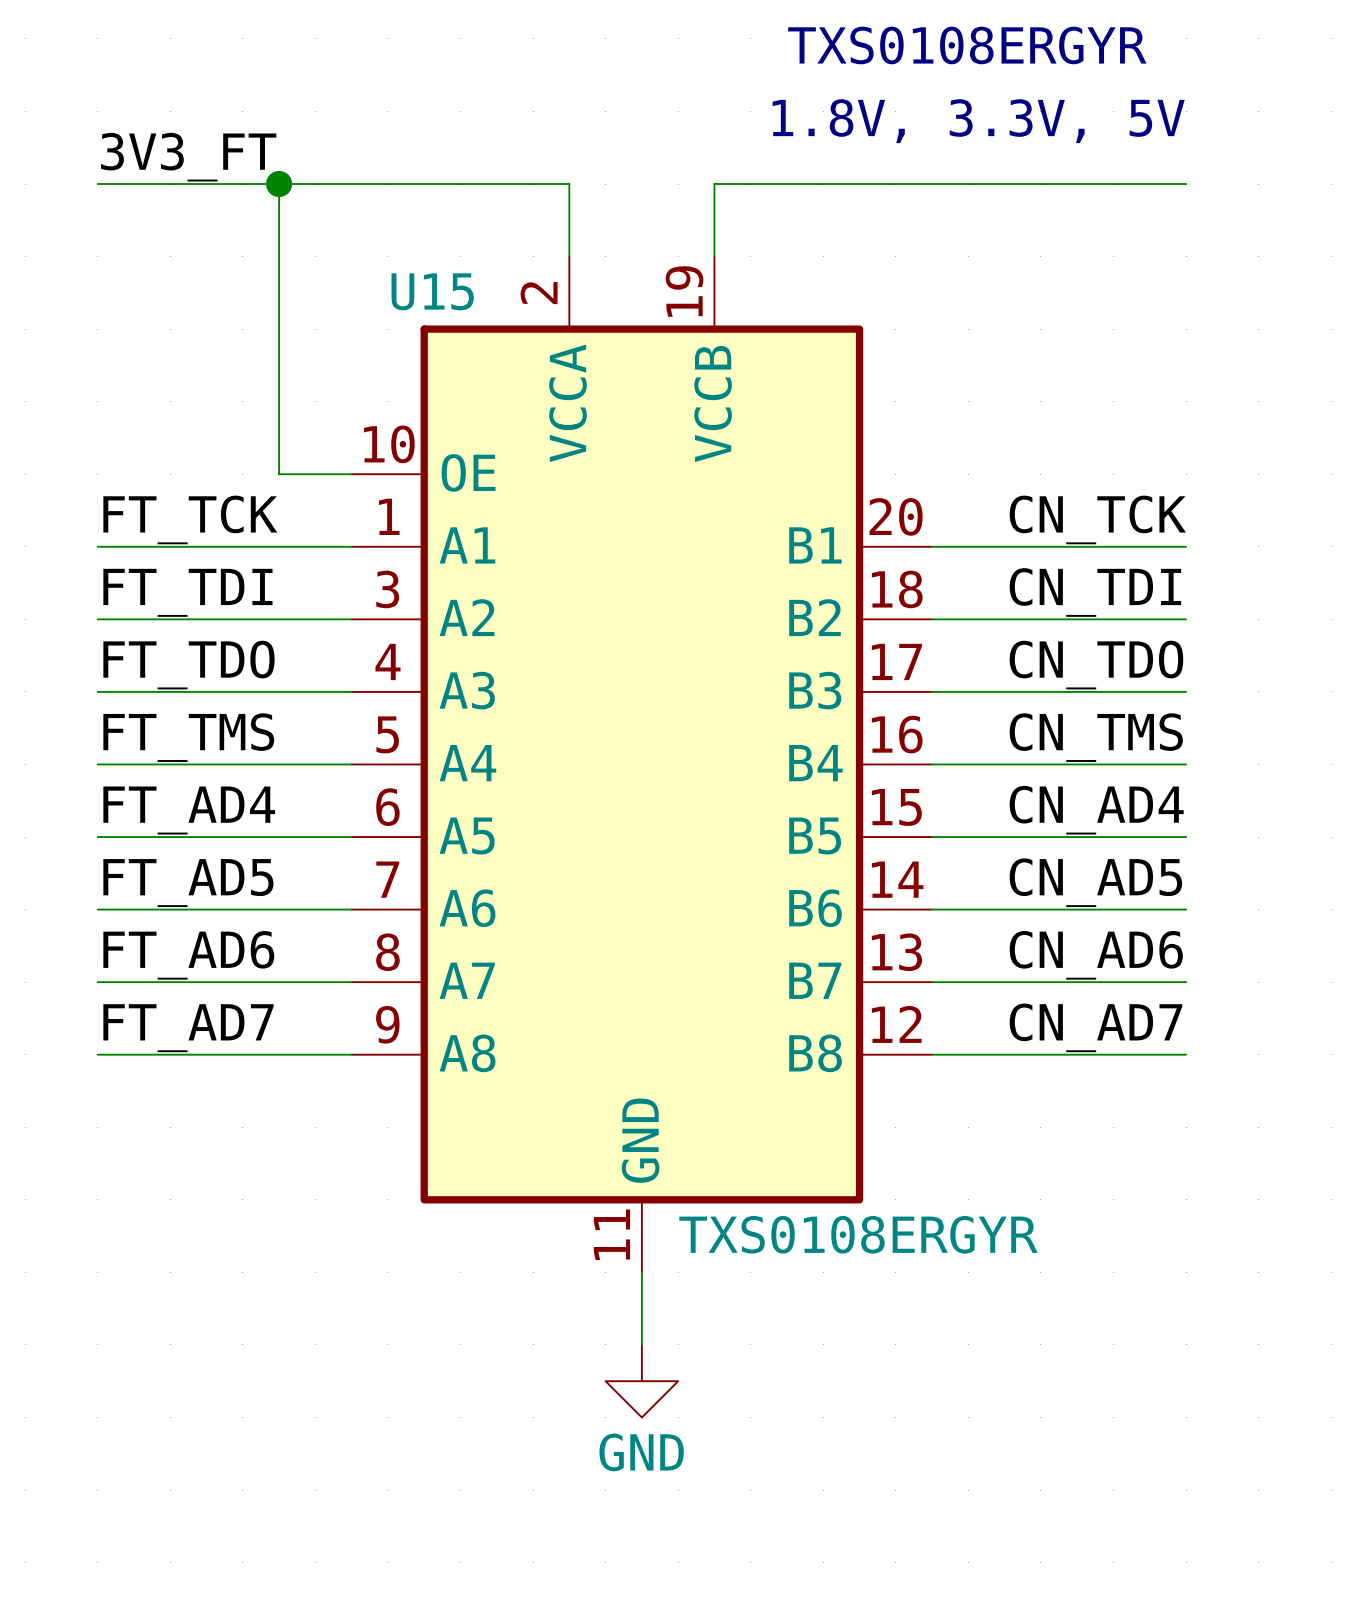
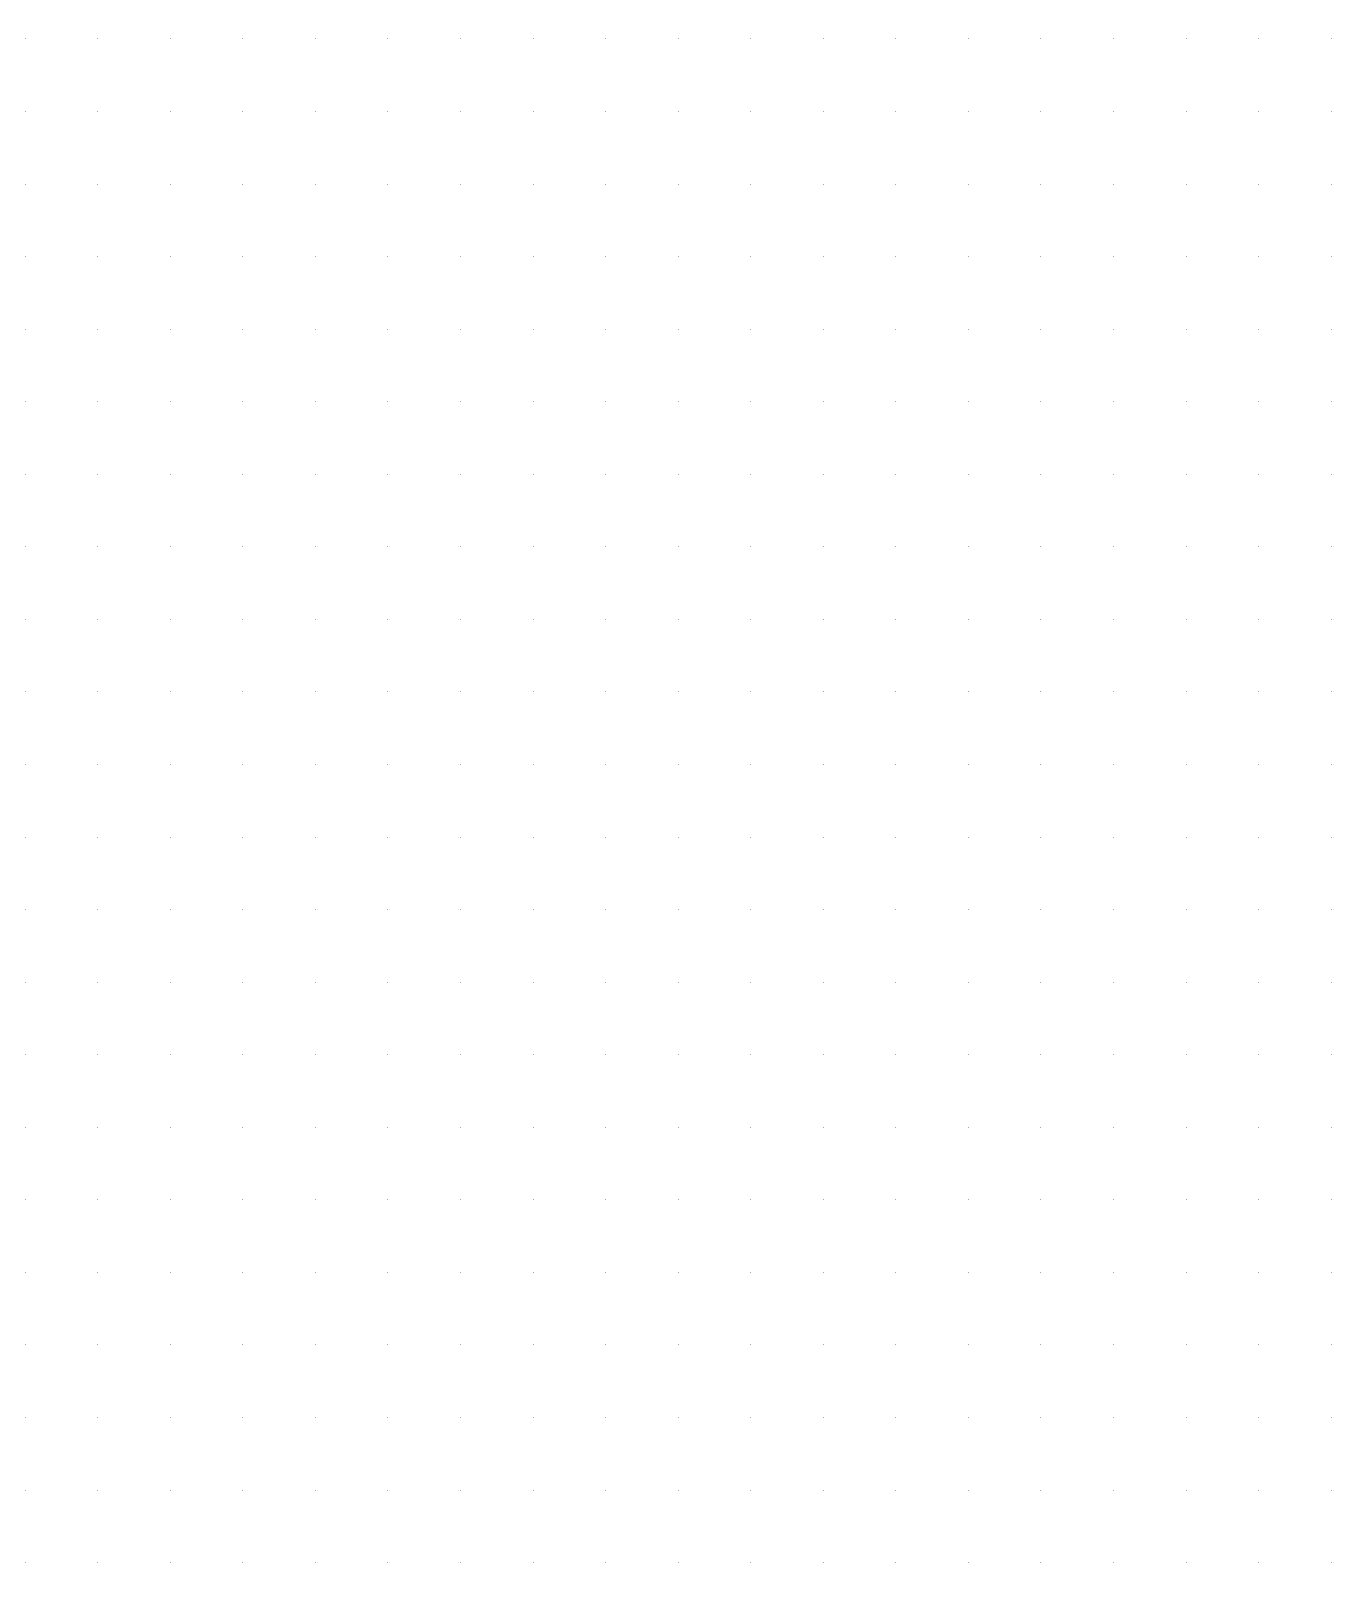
text: TXS0108ERGYR (967, 45) -> none
text: 1.8V, 3.3V, 5V (978, 121) -> none
label: 3V3_FT (188, 157) -> none
wire: (97, 184) (569, 184) (569, 256) -> none
wire: (279, 184) (279, 474) (351, 474) -> none
junction: (279, 184) -> none
wire: (1186, 184) (714, 184) (714, 256) -> none
label: FT_TCK (190, 519) -> none
label: CN_TCK (1097, 519) -> none
wire: (97, 546) (351, 546) -> none
wire: (932, 546) (1186, 546) -> none
label: FT_TDI (187, 592) -> none
label: CN_TDI (1095, 592) -> none
wire: (97, 619) (351, 619) -> none
wire: (932, 619) (1186, 619) -> none
label: FT_TDO (189, 665) -> none
label: CN_TDO (1096, 665) -> none
wire: (97, 691) (351, 691) -> none
wire: (932, 691) (1186, 691) -> none
label: FT_TMS (188, 737) -> none
label: CN_TMS (1096, 737) -> none
wire: (97, 764) (351, 764) -> none
U15: TXS0108ERGYR (641, 764) -> none
wire: (932, 764) (1186, 764) -> none
label: FT_AD4 (189, 810) -> none
label: CN_AD4 (1096, 810) -> none
wire: (97, 837) (351, 837) -> none
wire: (932, 837) (1186, 837) -> none
label: CN_AD5 (1095, 882) -> none
label: FT_AD5 (188, 883) -> none
wire: (97, 909) (351, 909) -> none
wire: (932, 909) (1186, 909) -> none
label: FT_AD6 (188, 955) -> none
label: CN_AD6 (1096, 955) -> none
wire: (97, 982) (351, 982) -> none
wire: (932, 982) (1186, 982) -> none
label: CN_AD7 (1096, 1027) -> none
label: FT_AD7 (188, 1028) -> none
wire: (97, 1054) (351, 1054) -> none
wire: (932, 1054) (1186, 1054) -> none
wire: (641, 1272) (641, 1344) -> none
power symbol: GND (641, 1381) -> none

